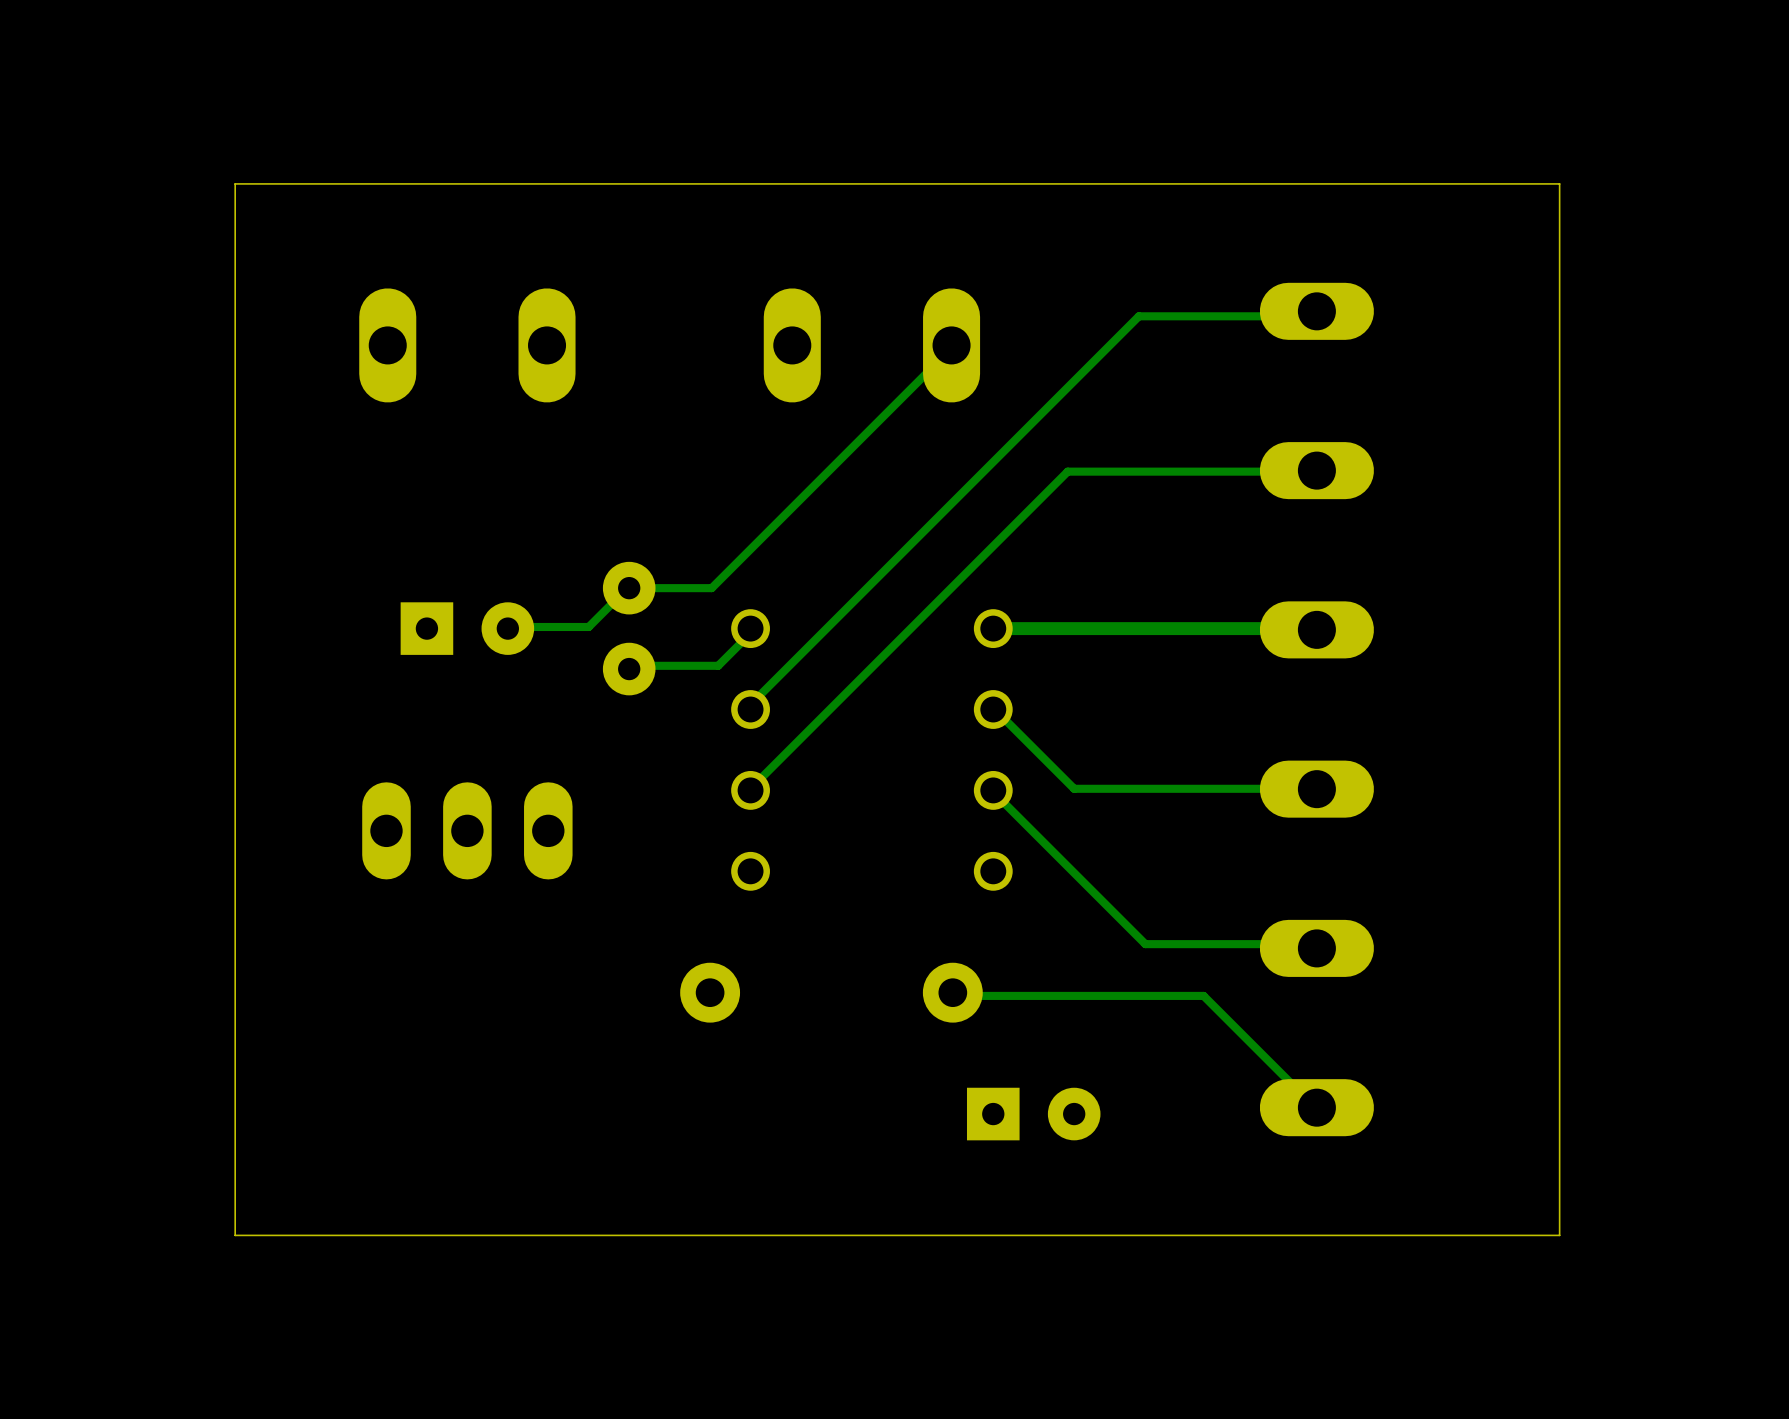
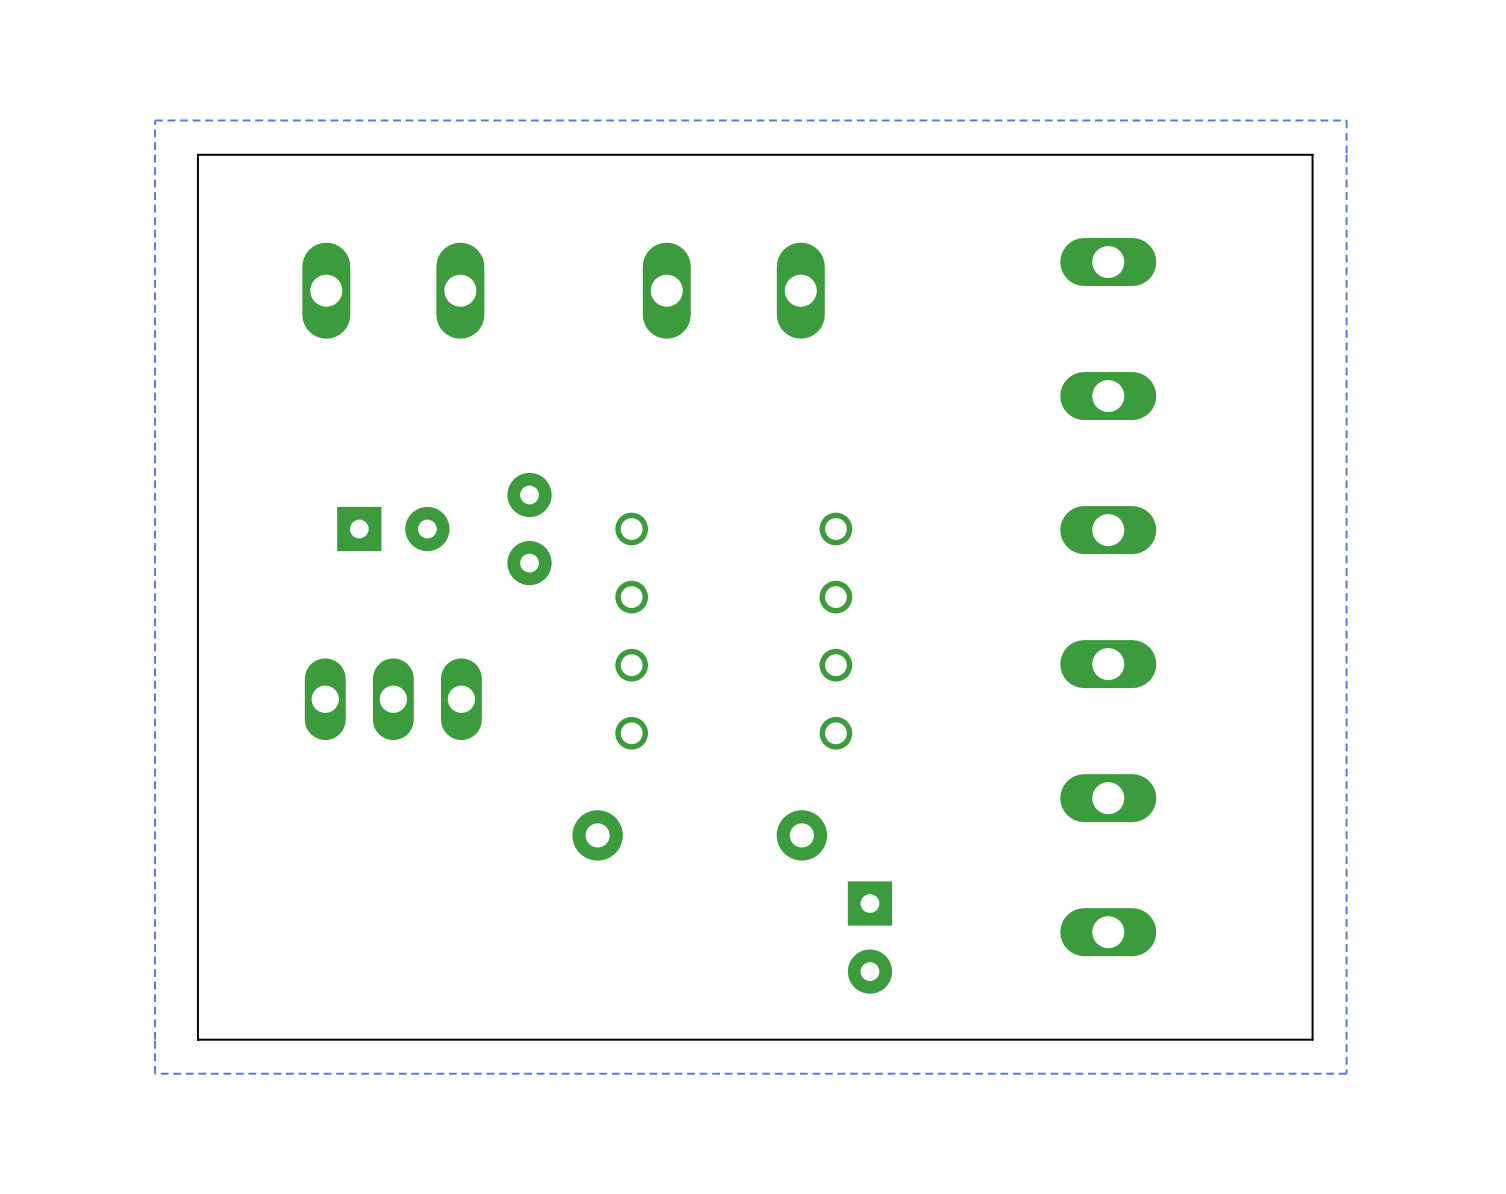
zone outline: none -> (1346, 120) (1346, 1073) (155, 1073) (155, 120) (1346, 120)
track: (1316, 311) (1313, 316) (1138, 316) (750, 704) (750, 709) -> none
track: (951, 345) (951, 348) (711, 588) (627, 588) (588, 626) (511, 626) (507, 628) -> none
track: (1316, 470) (1067, 471) (750, 790) -> none
track: (750, 628) (750, 633) (718, 665) (634, 665) (629, 669) -> none
track: (993, 628) (1316, 629) -> none
track: (993, 709) (1074, 788) (1316, 789) -> none
track: (993, 790) (1145, 944) (1313, 944) (1316, 948) -> none
track: (952, 992) (957, 995) (1203, 995) (1316, 1107) -> none
part rotation: 0° (1033, 1114) -> 90° clockwise (869, 937)

